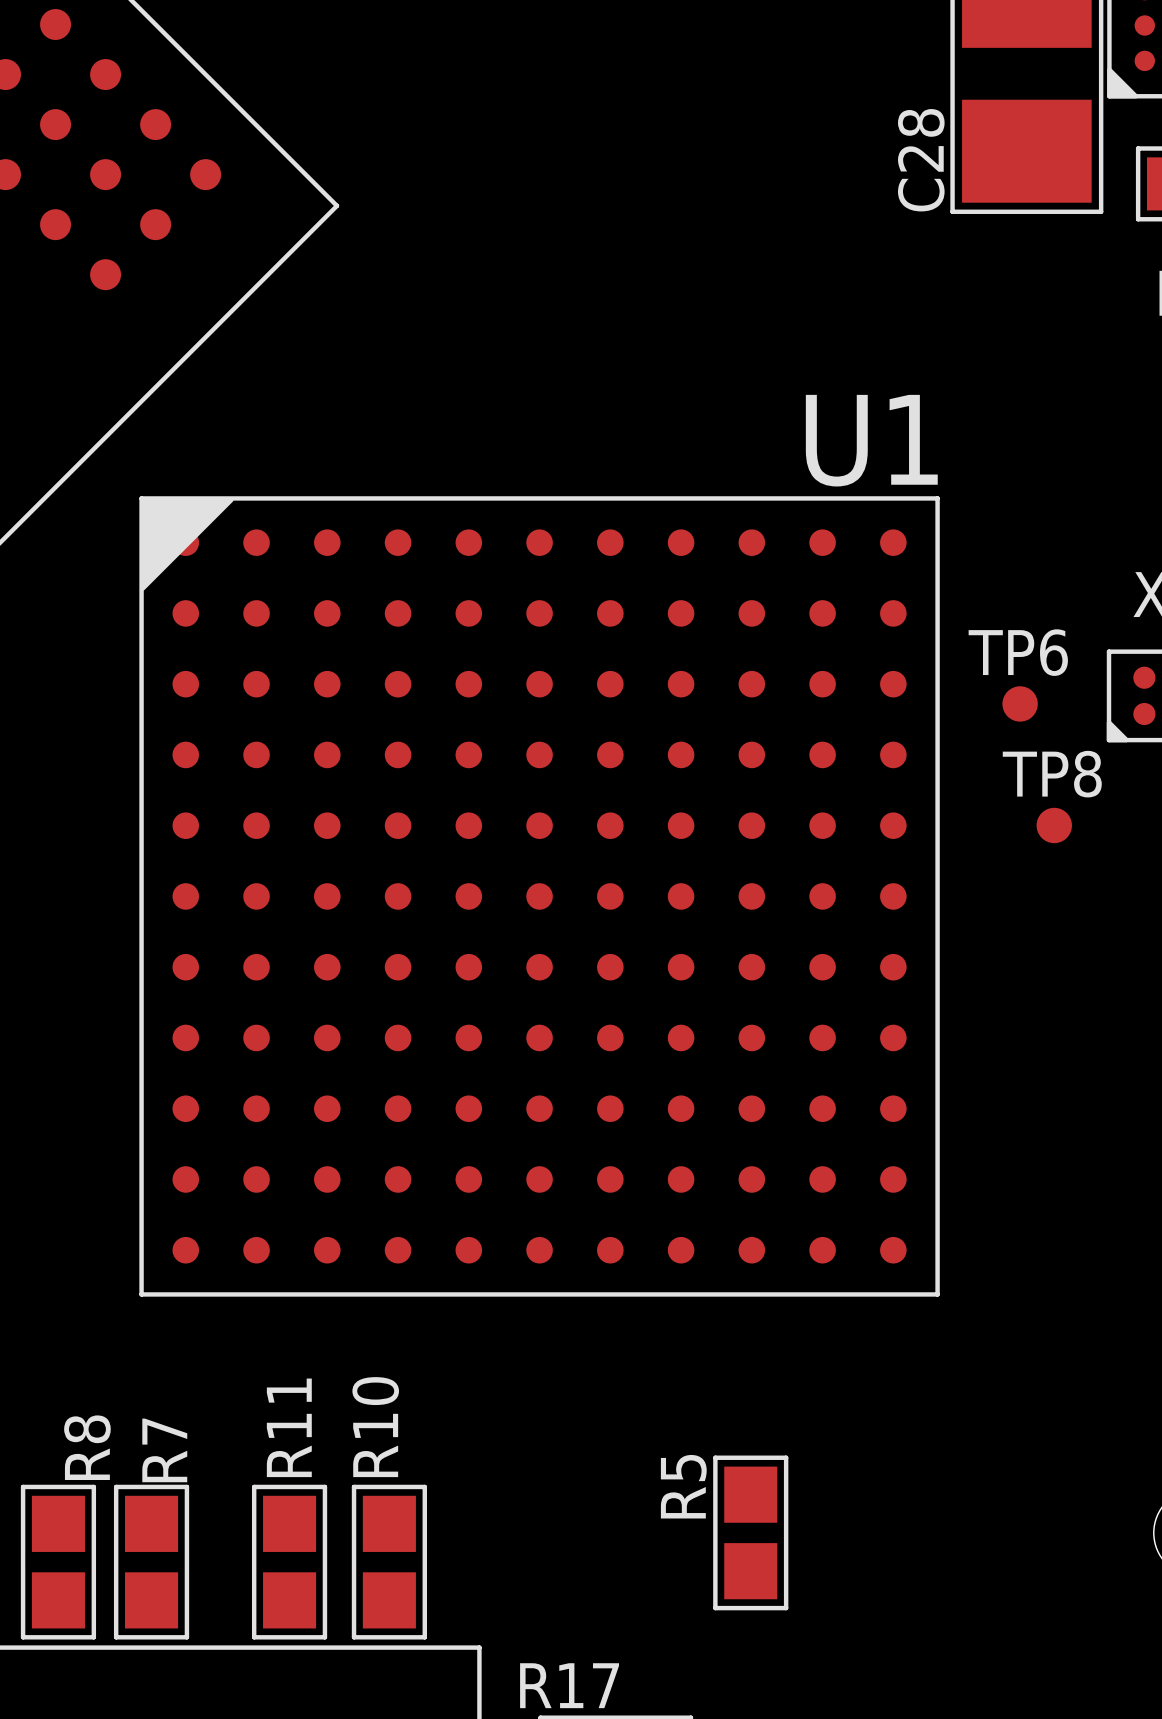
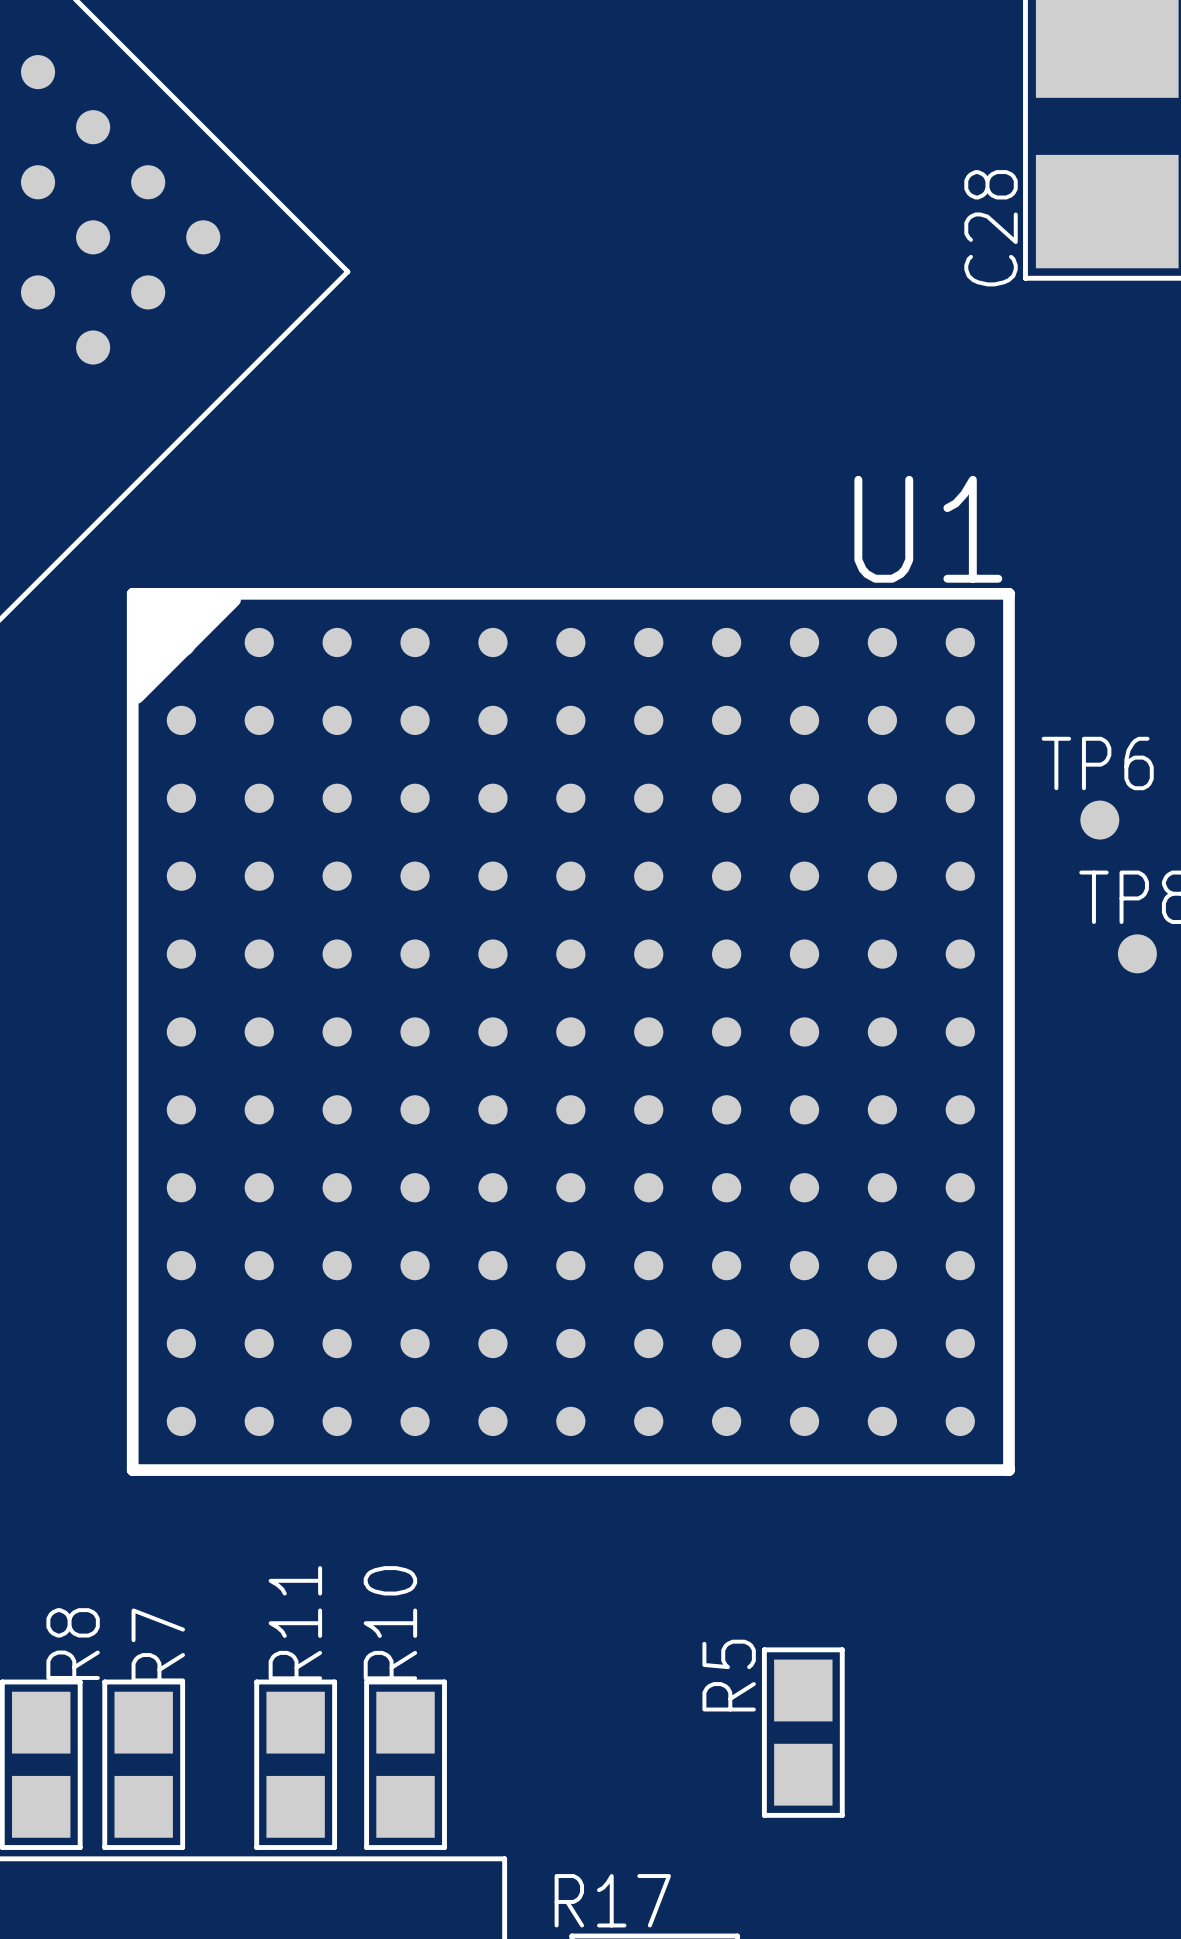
U1 footprint: [139, 496, 940, 1297] -> [126, 587, 1015, 1476]

